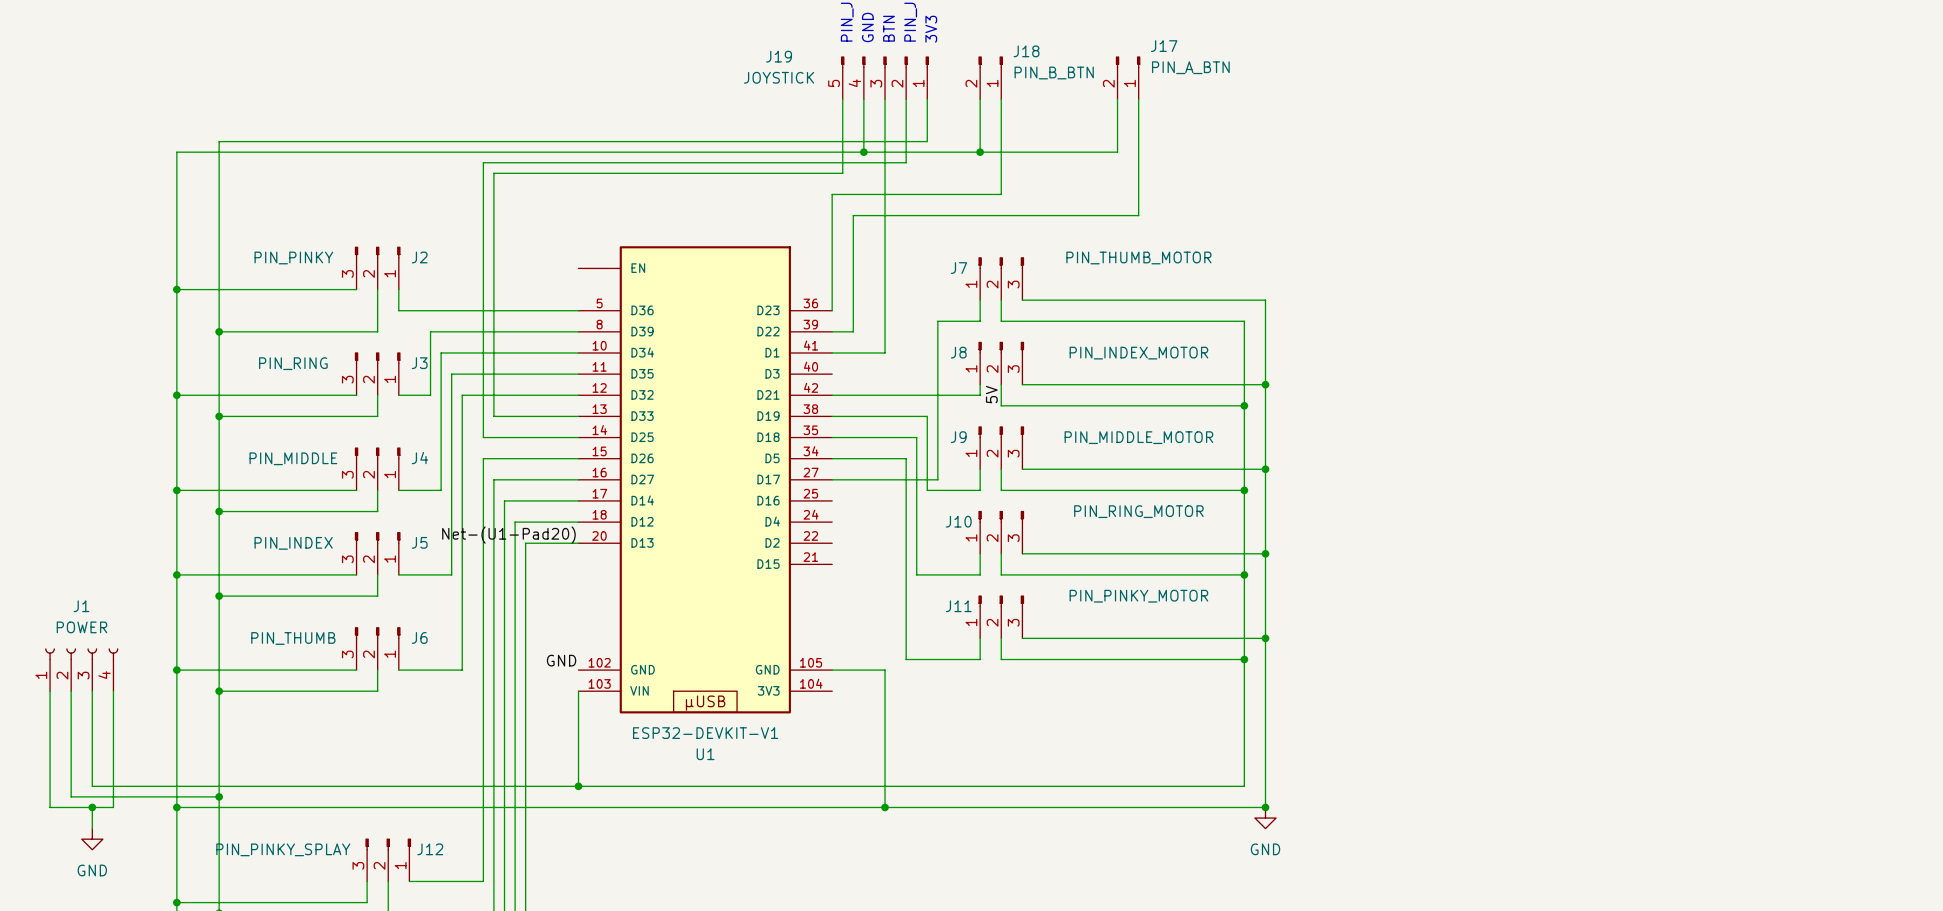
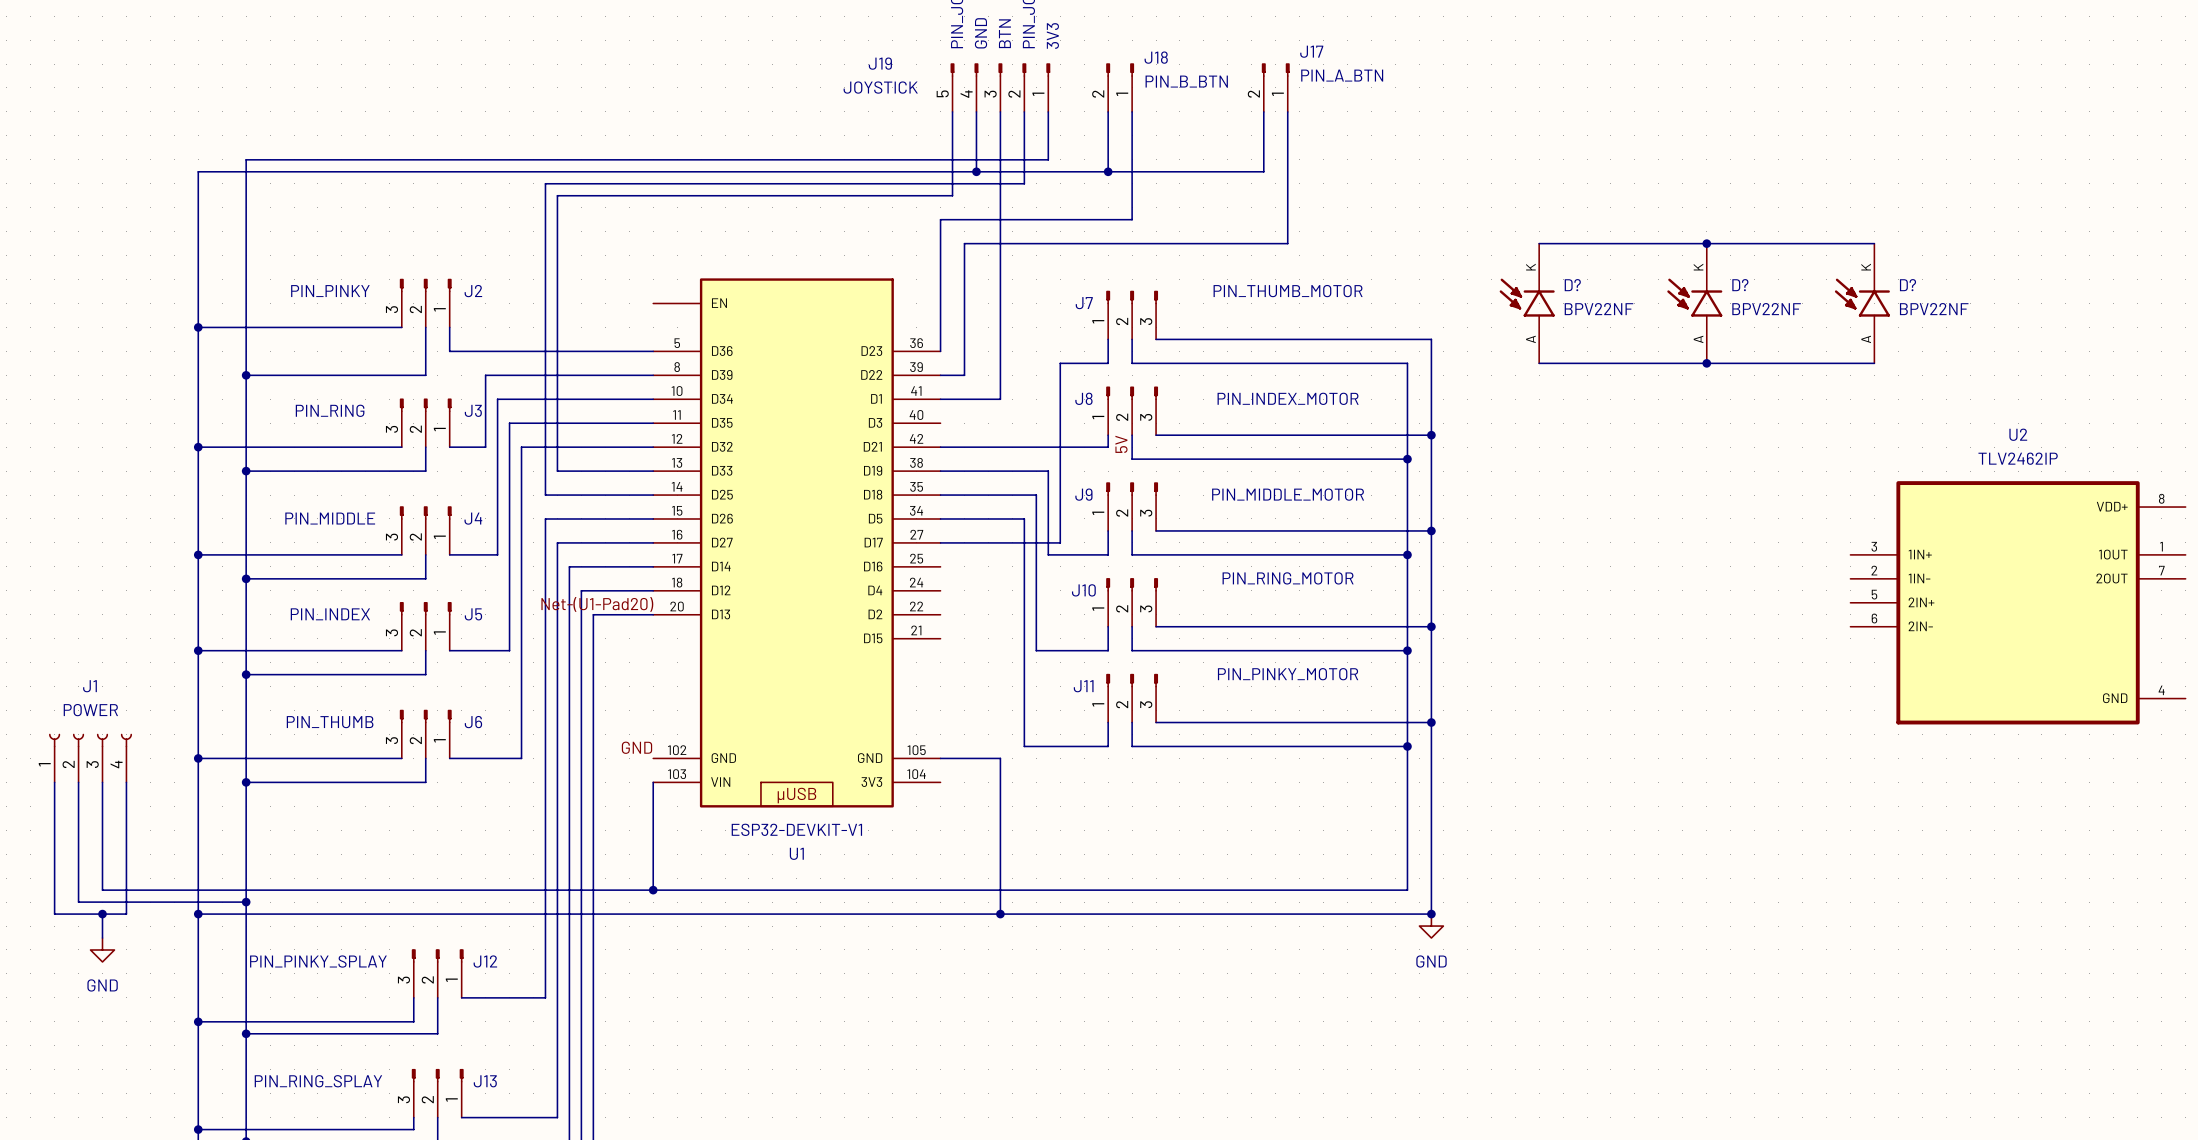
wire: none -> (1539, 243) (1874, 243)
junction: none -> (1706, 243)
D?: none -> BPV22NF (1527, 303)
D?: none -> BPV22NF (1694, 303)
D?: none -> BPV22NF (1862, 303)
wire: none -> (1539, 363) (1874, 363)
junction: none -> (1706, 363)
U2: none -> TLV2462IP (2018, 602)

